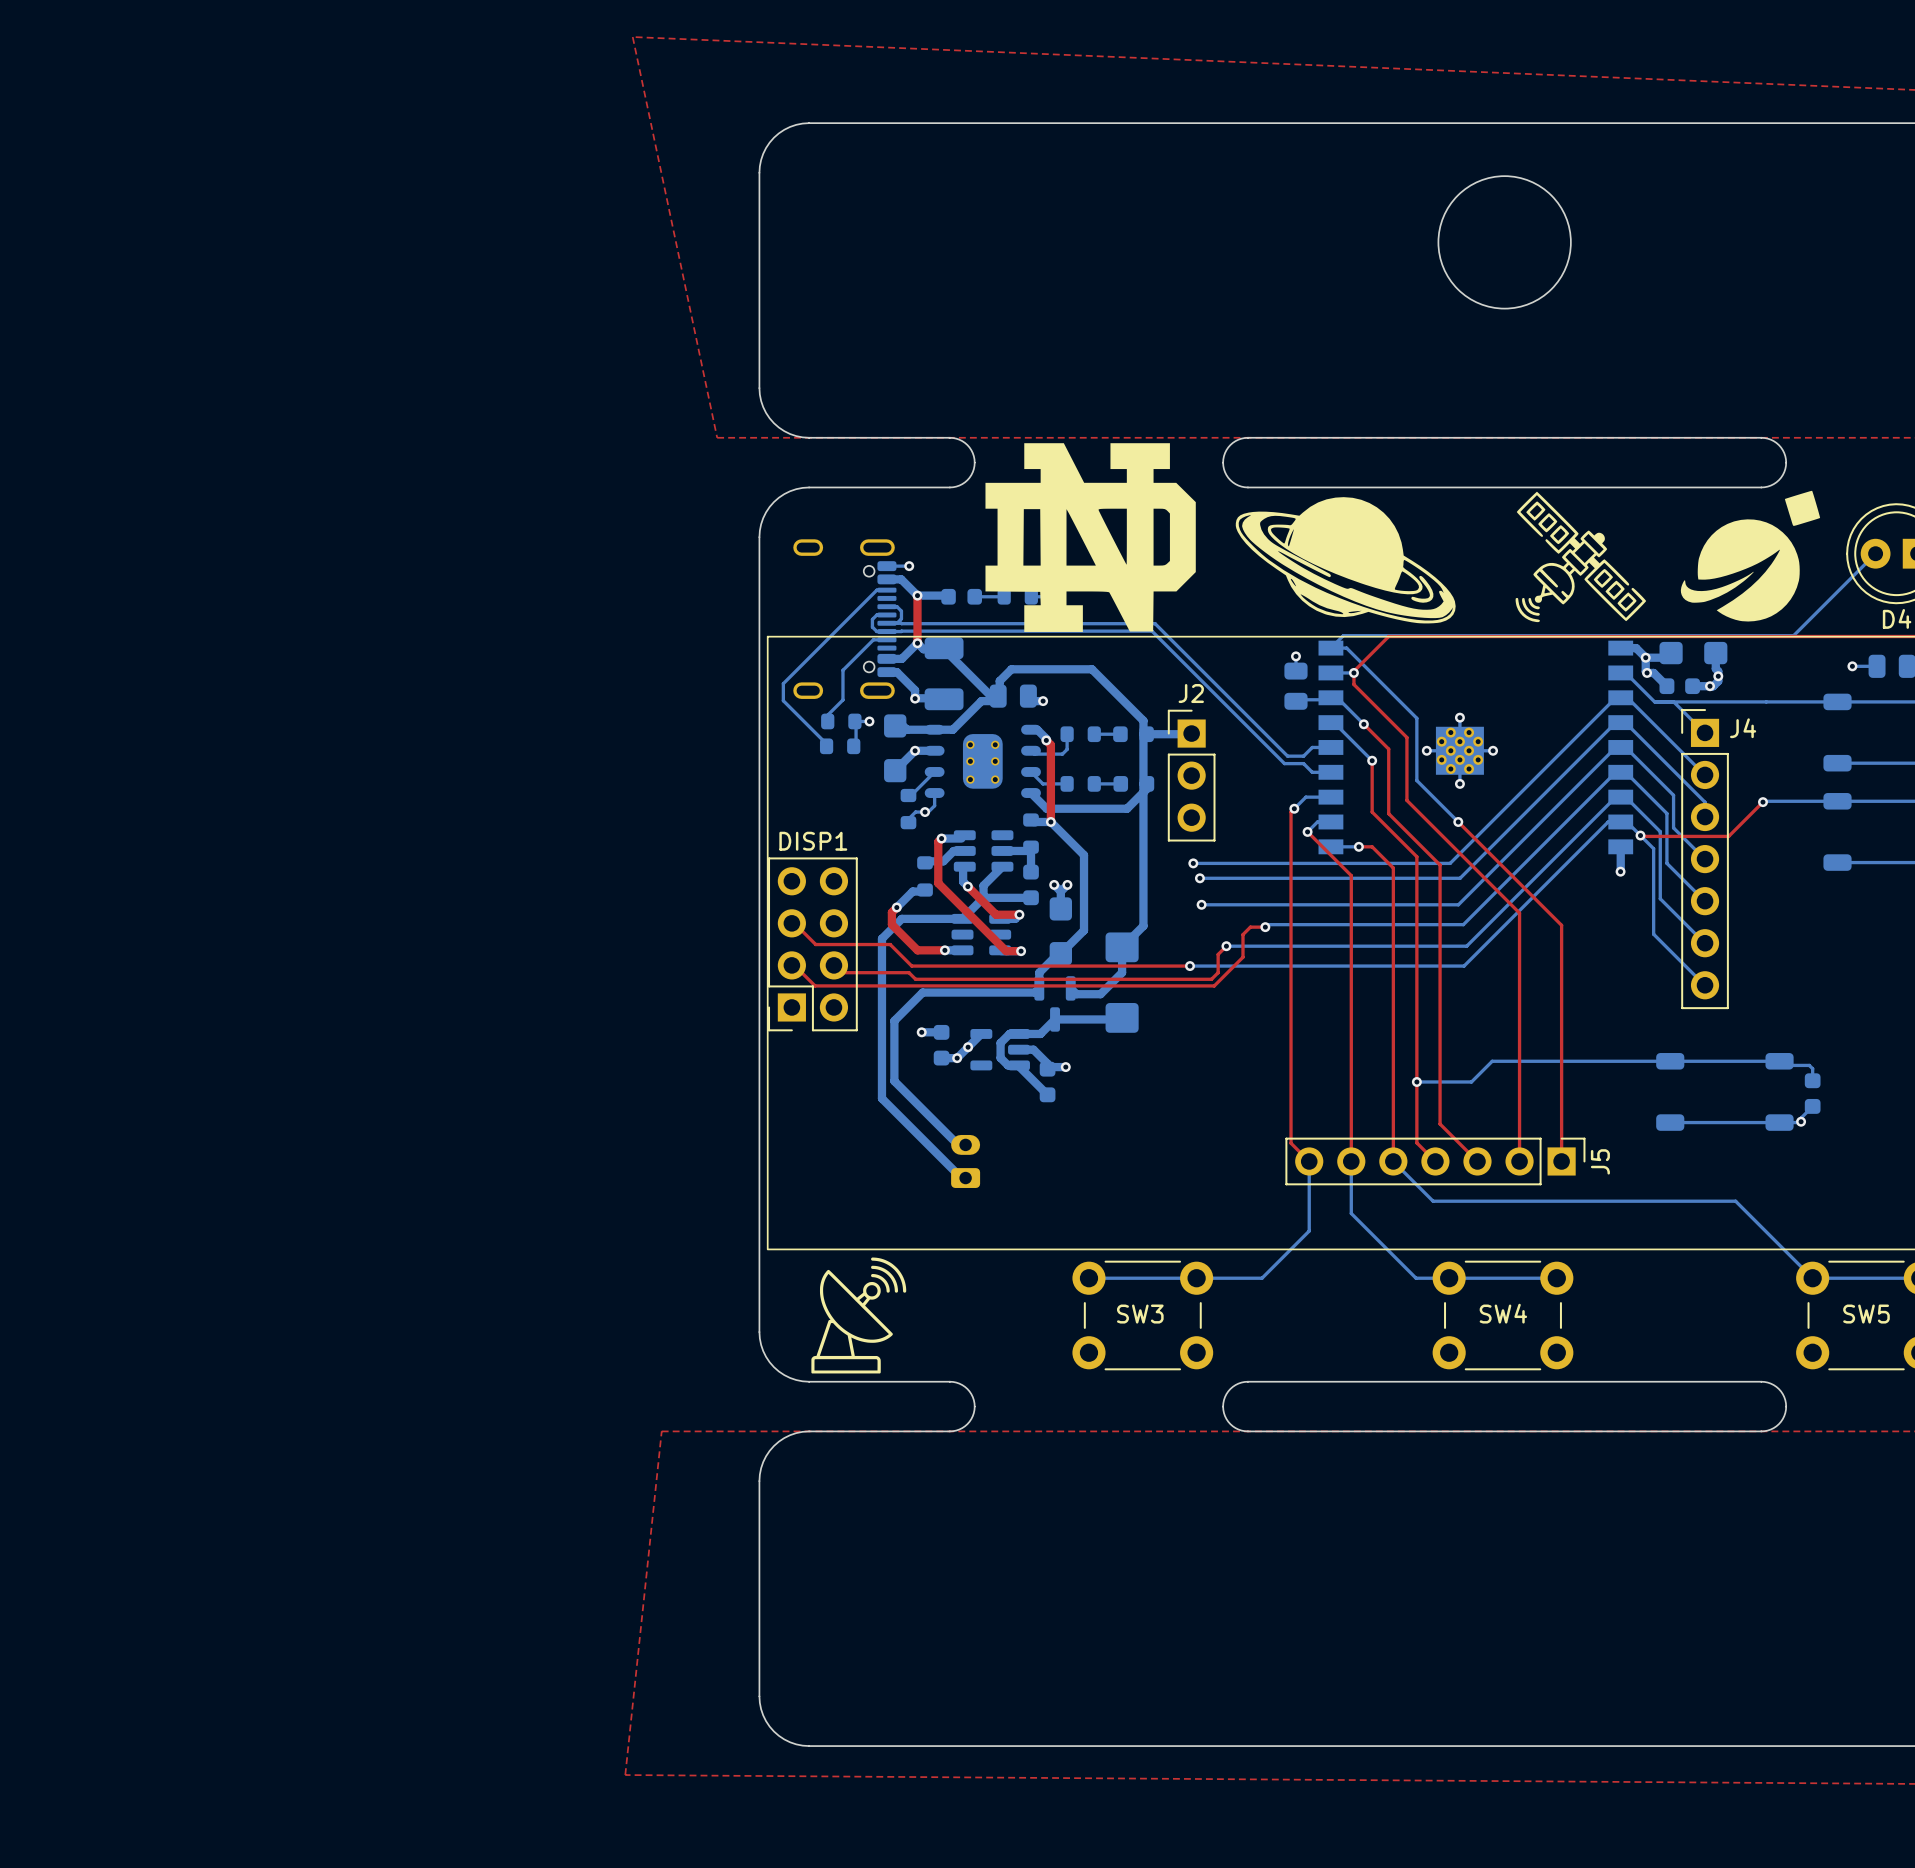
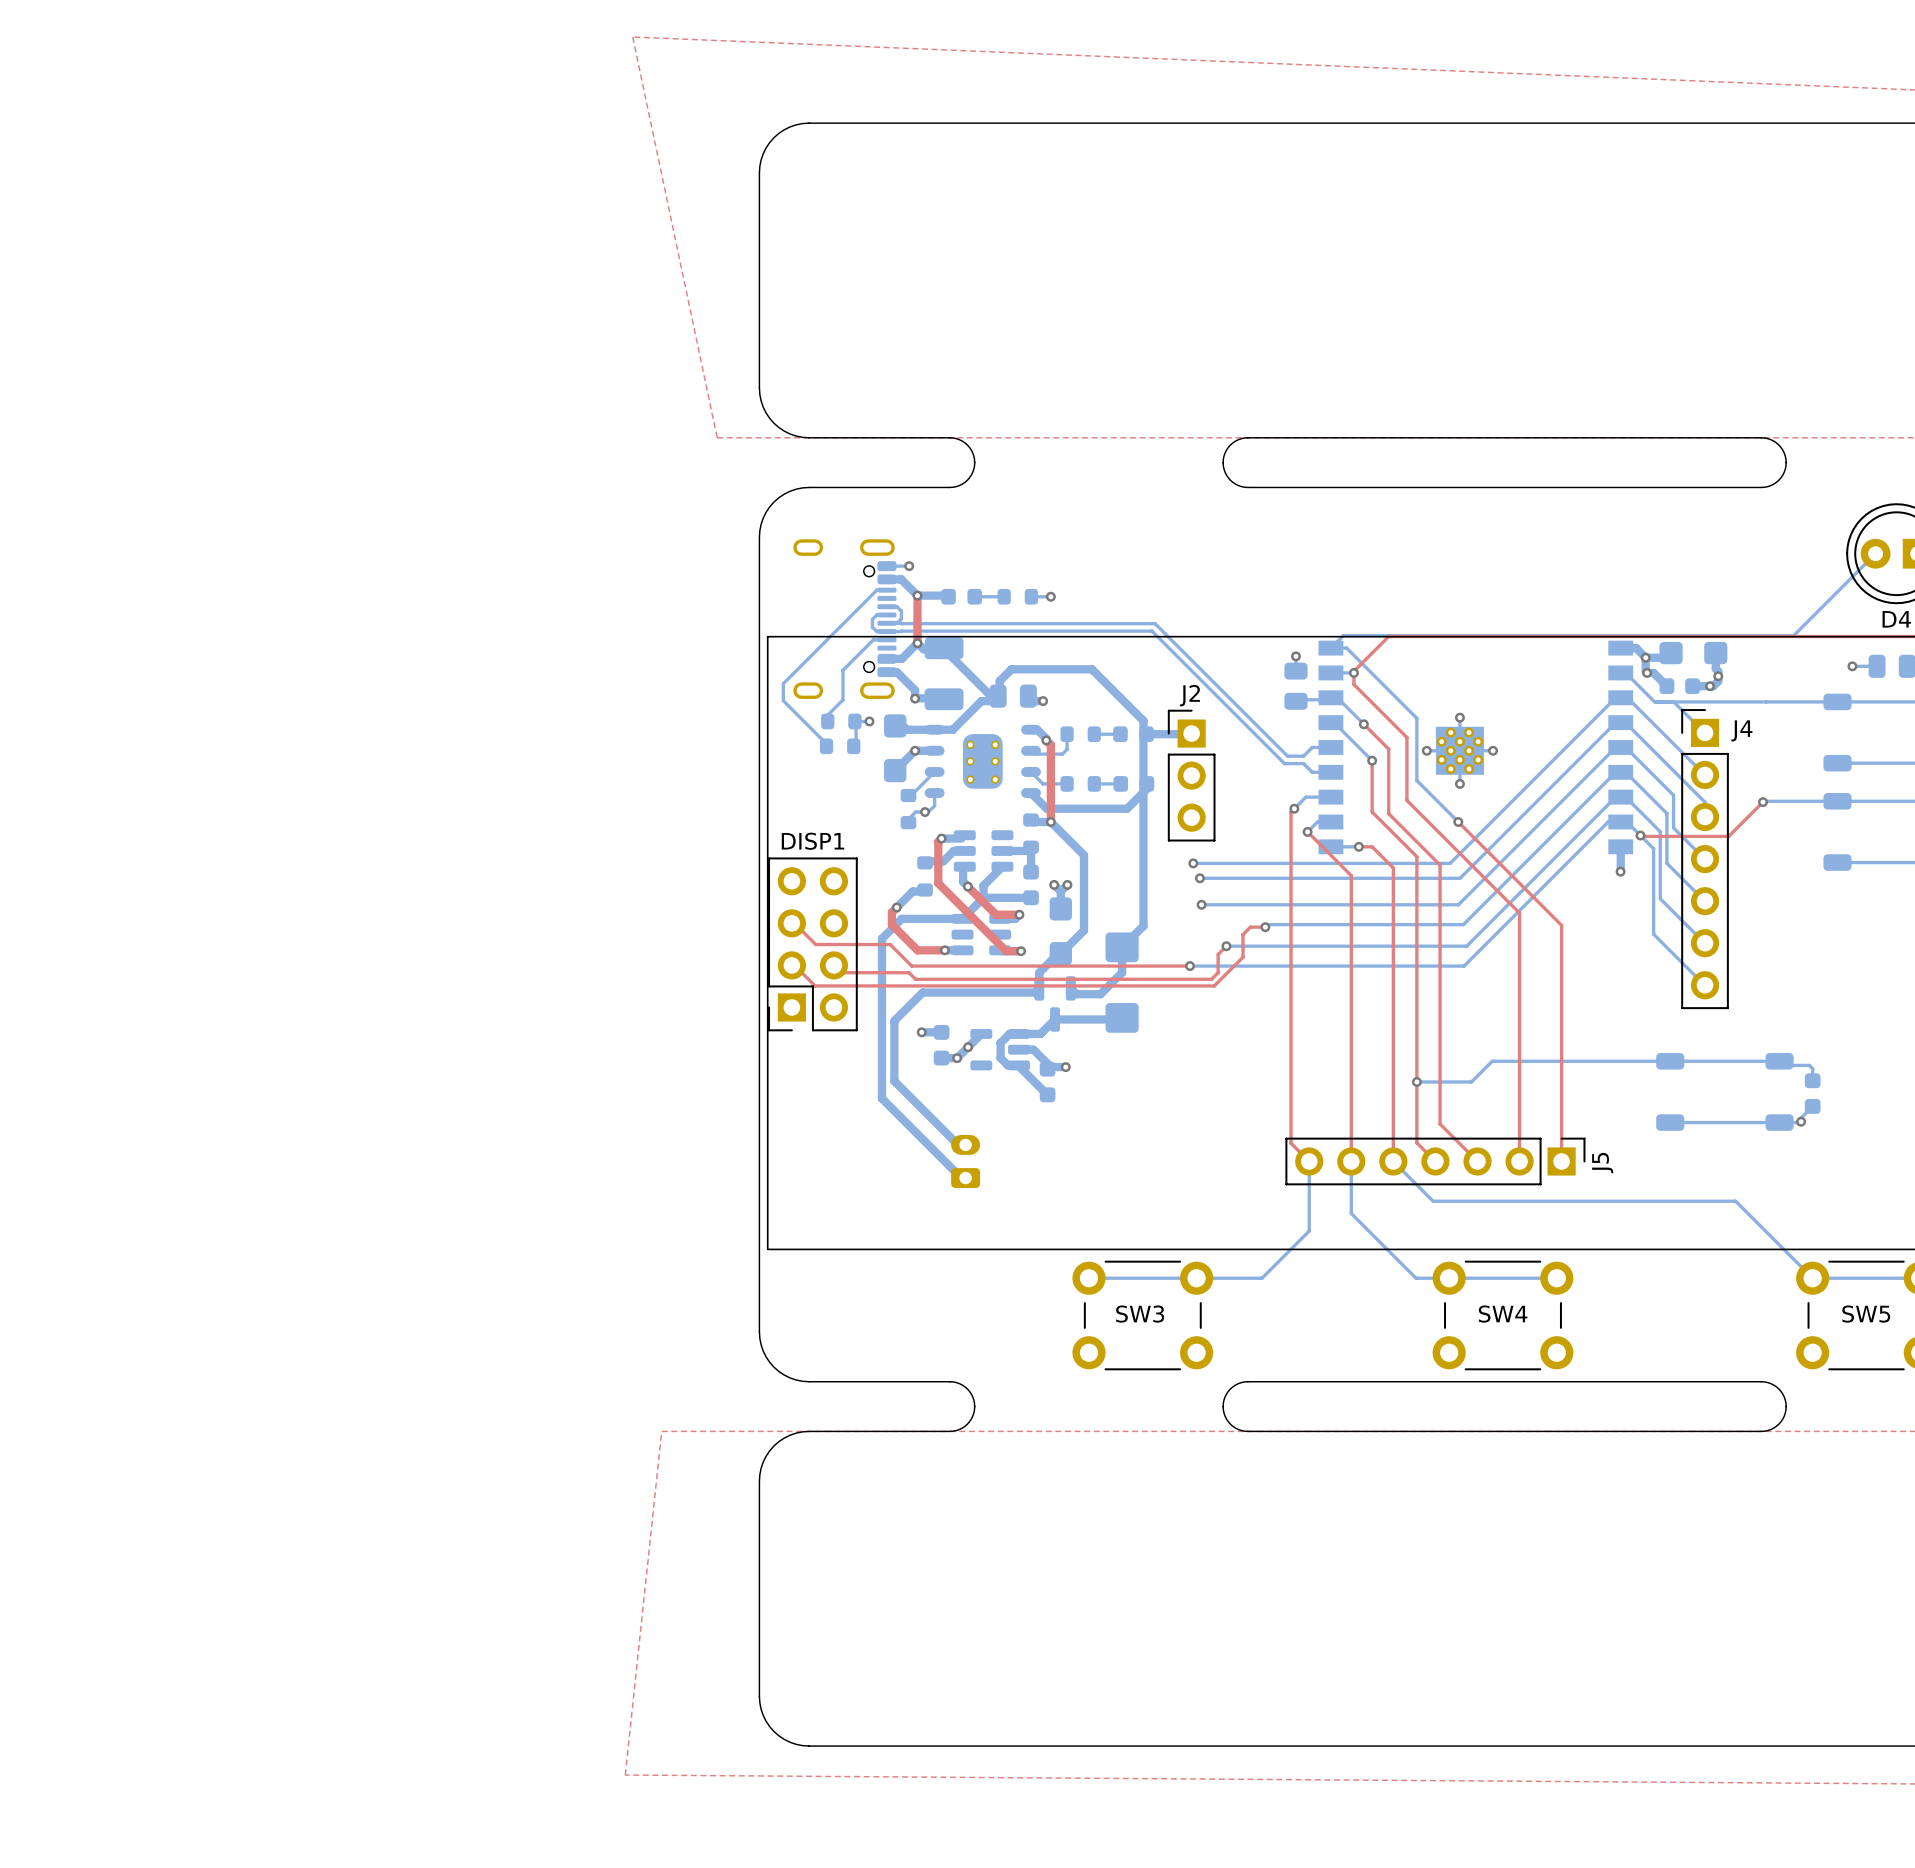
round board edge: [1437, 175, 1572, 310] -> none
drawing: [985, 443, 1196, 632] -> none
drawing: [1680, 490, 1821, 622] -> none
drawing: [1515, 491, 1647, 623] -> none
drawing: [1235, 497, 1456, 624] -> none
drawing: [811, 1257, 907, 1374] -> none

